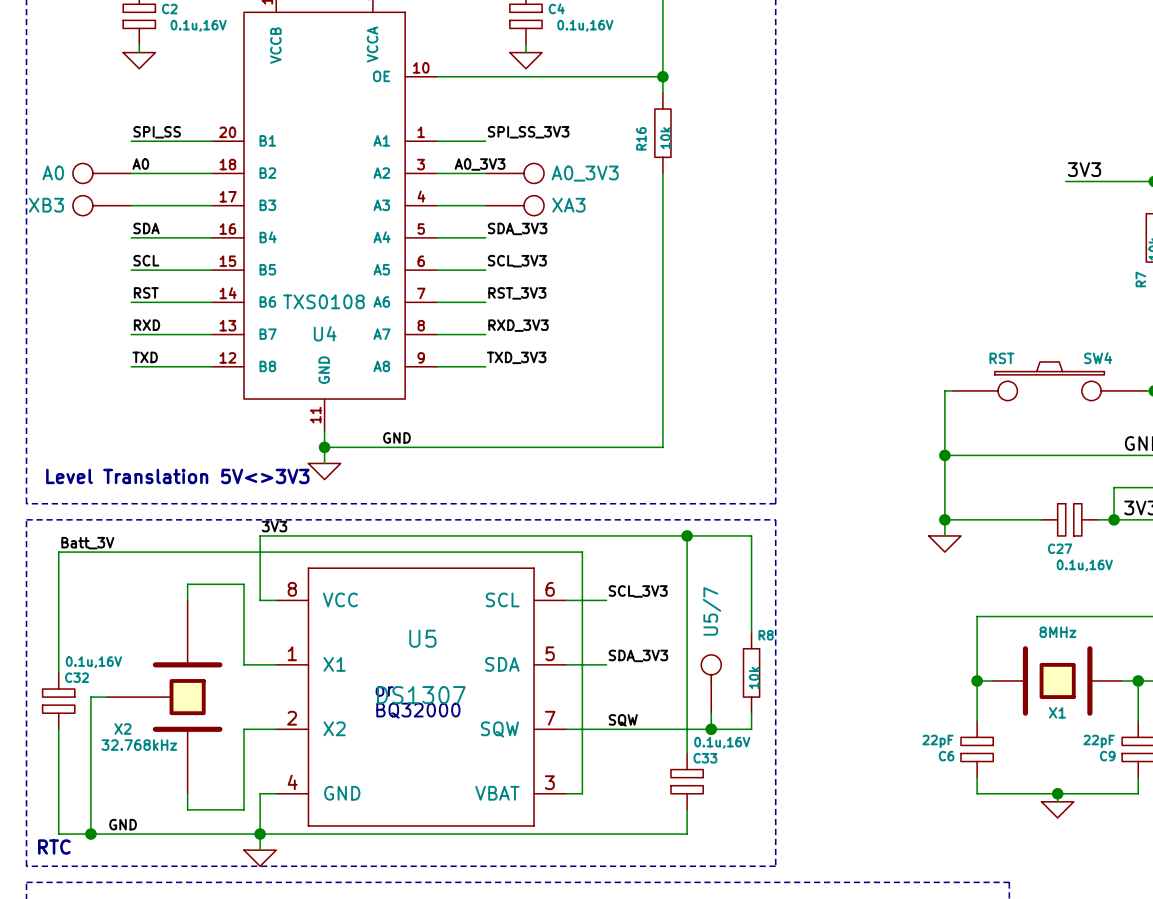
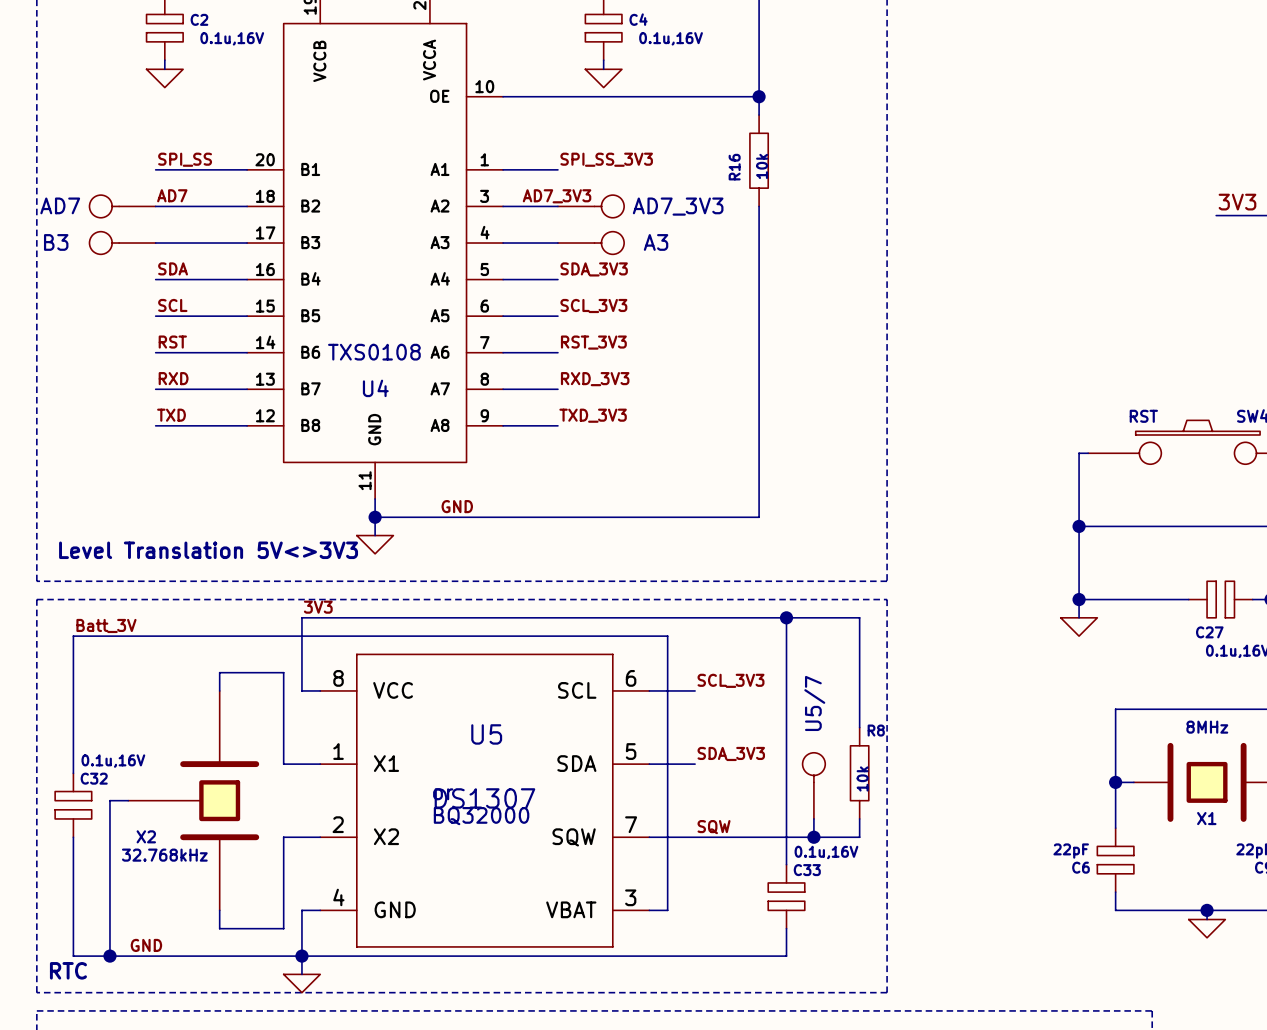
label: A0 (140, 164) -> AD7 (172, 195)
label: A0_3V3 (480, 164) -> AD7_3V3 (557, 196)
A0 name: A0 (53, 172) -> AD7 (60, 205)
A0_3V3 name: A0_3V3 (585, 173) -> AD7_3V3 (678, 206)
XB3 name: XB3 (46, 205) -> B3 (56, 242)
XA3 name: XA3 (568, 205) -> A3 (656, 242)

